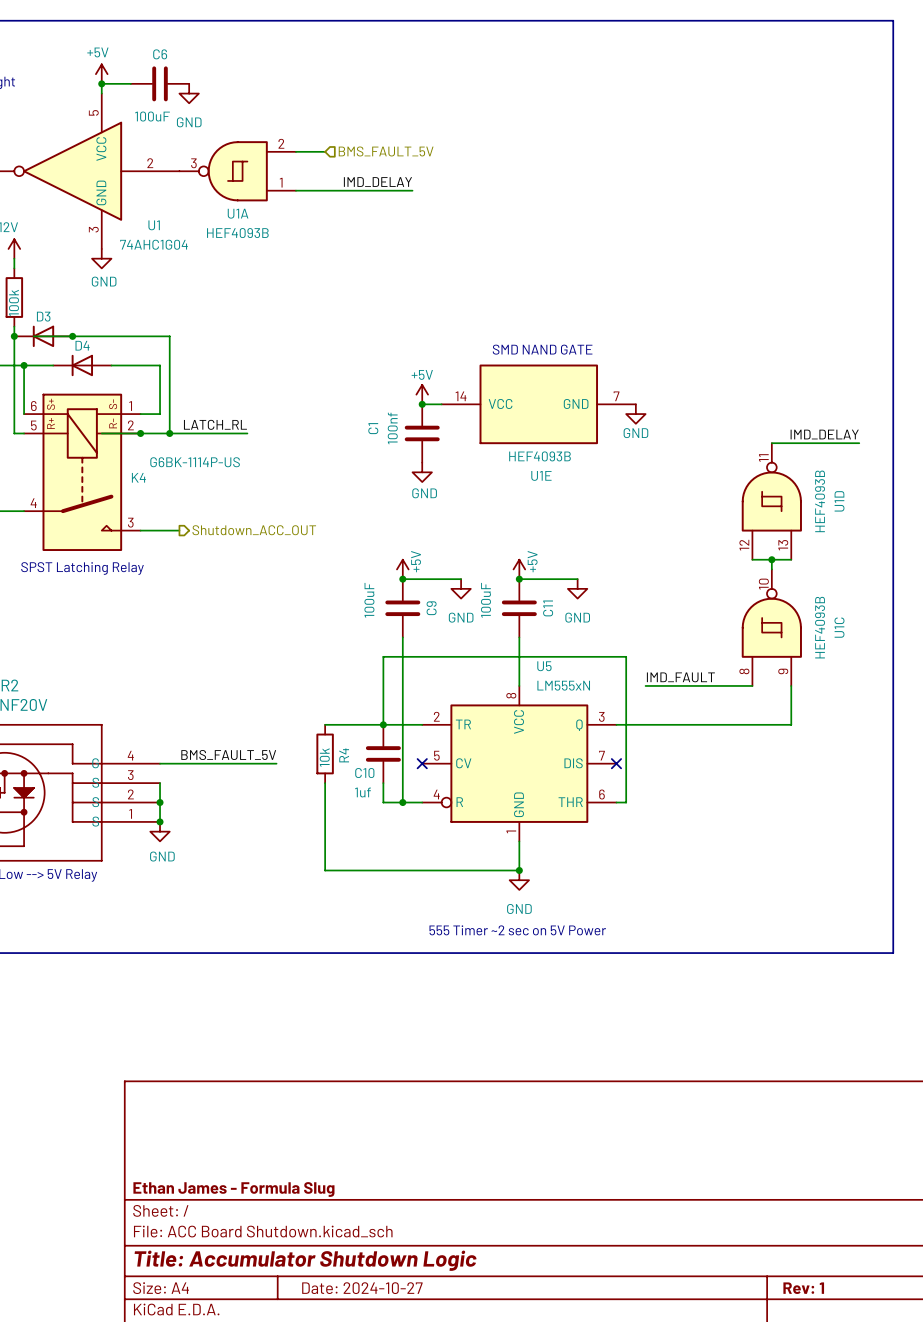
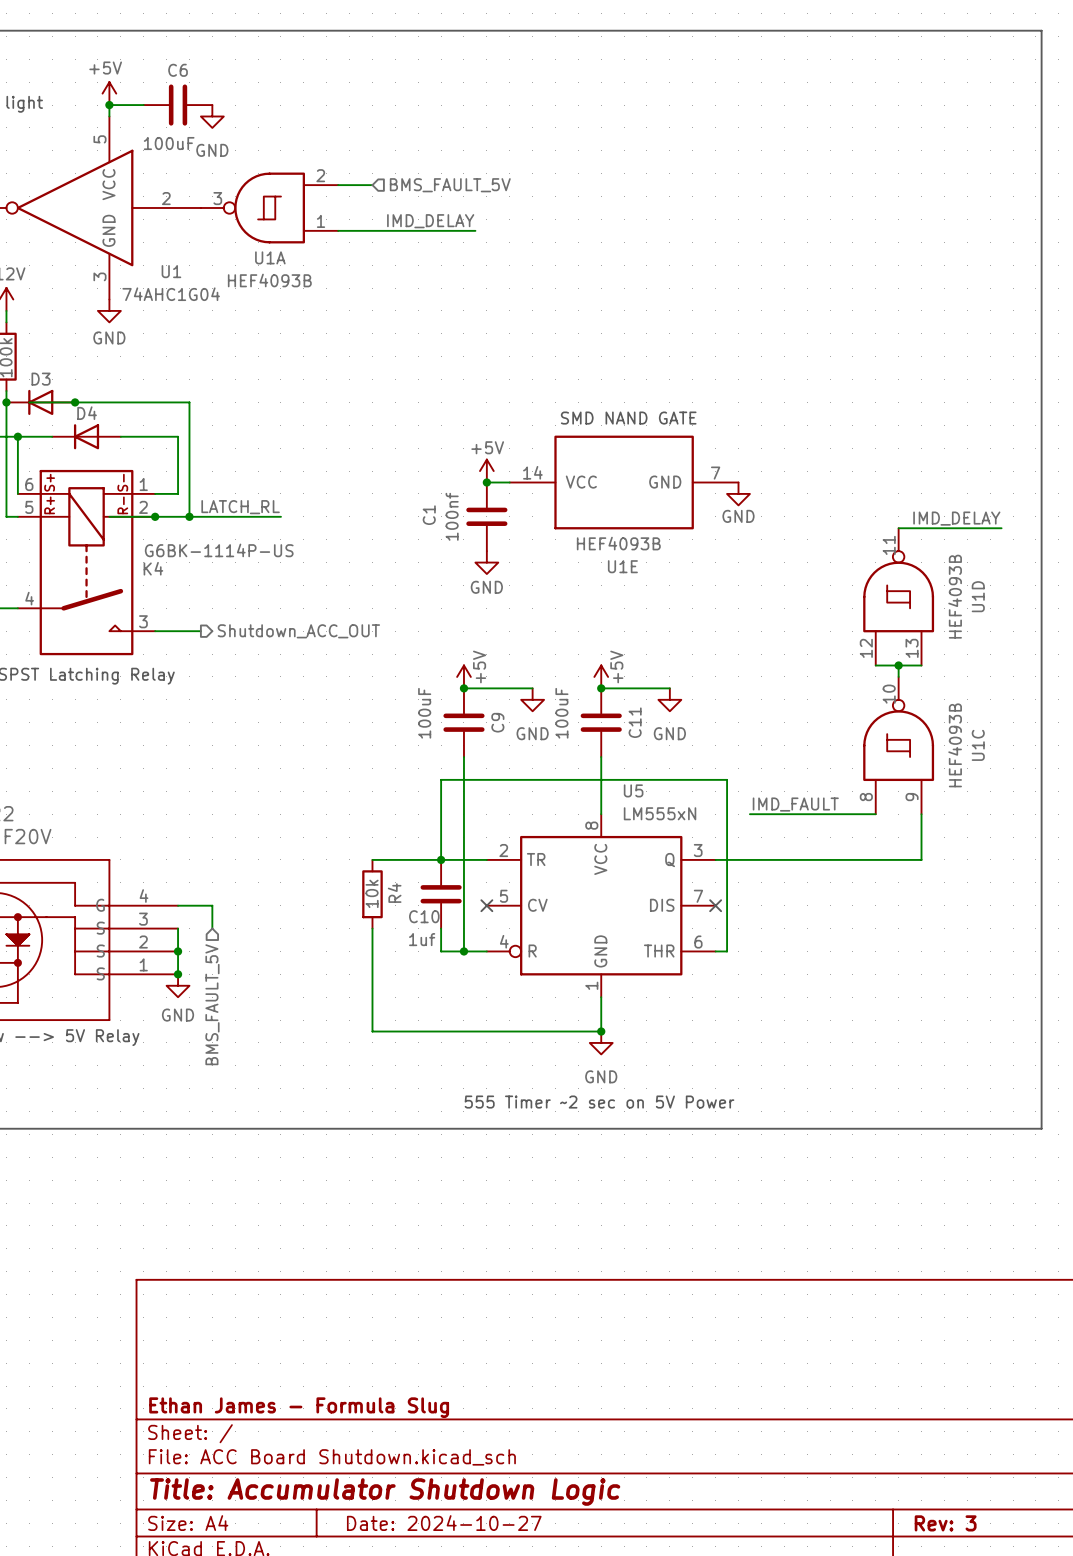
label: BMS_FAULT_5V (228, 755) -> none
wire: (189, 763) (276, 763) -> (212, 905) (212, 928)
hierarchical label: none -> BMS_FAULT_5V (212, 1004)
title block: Rev: 1 (803, 1288) -> Rev: 3 (945, 1523)

